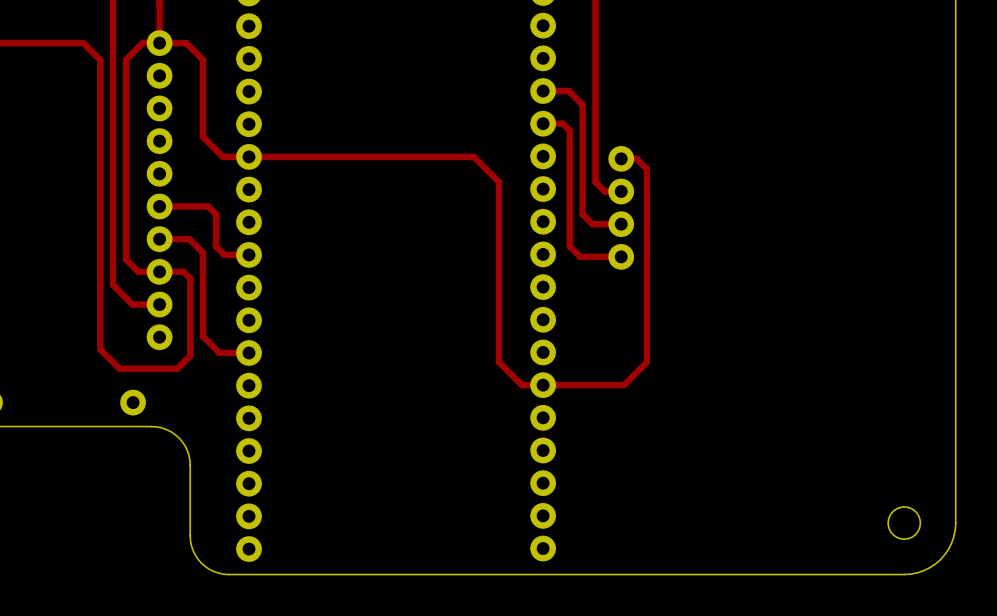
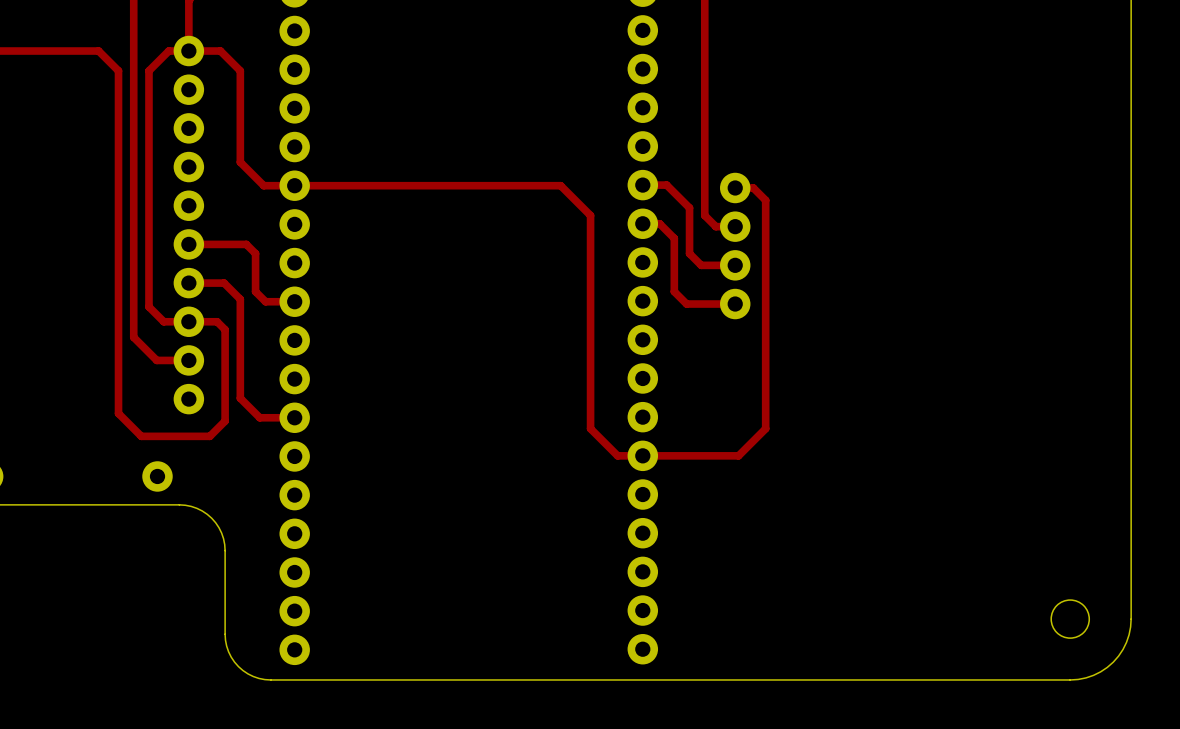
top track: (543, 91) (568, 91) (582, 104) (582, 175) -> (642, 185) (666, 185) (689, 207)
top track: (543, 123) (562, 123) (569, 130) (569, 201) -> (642, 223) (659, 223) (674, 238)

